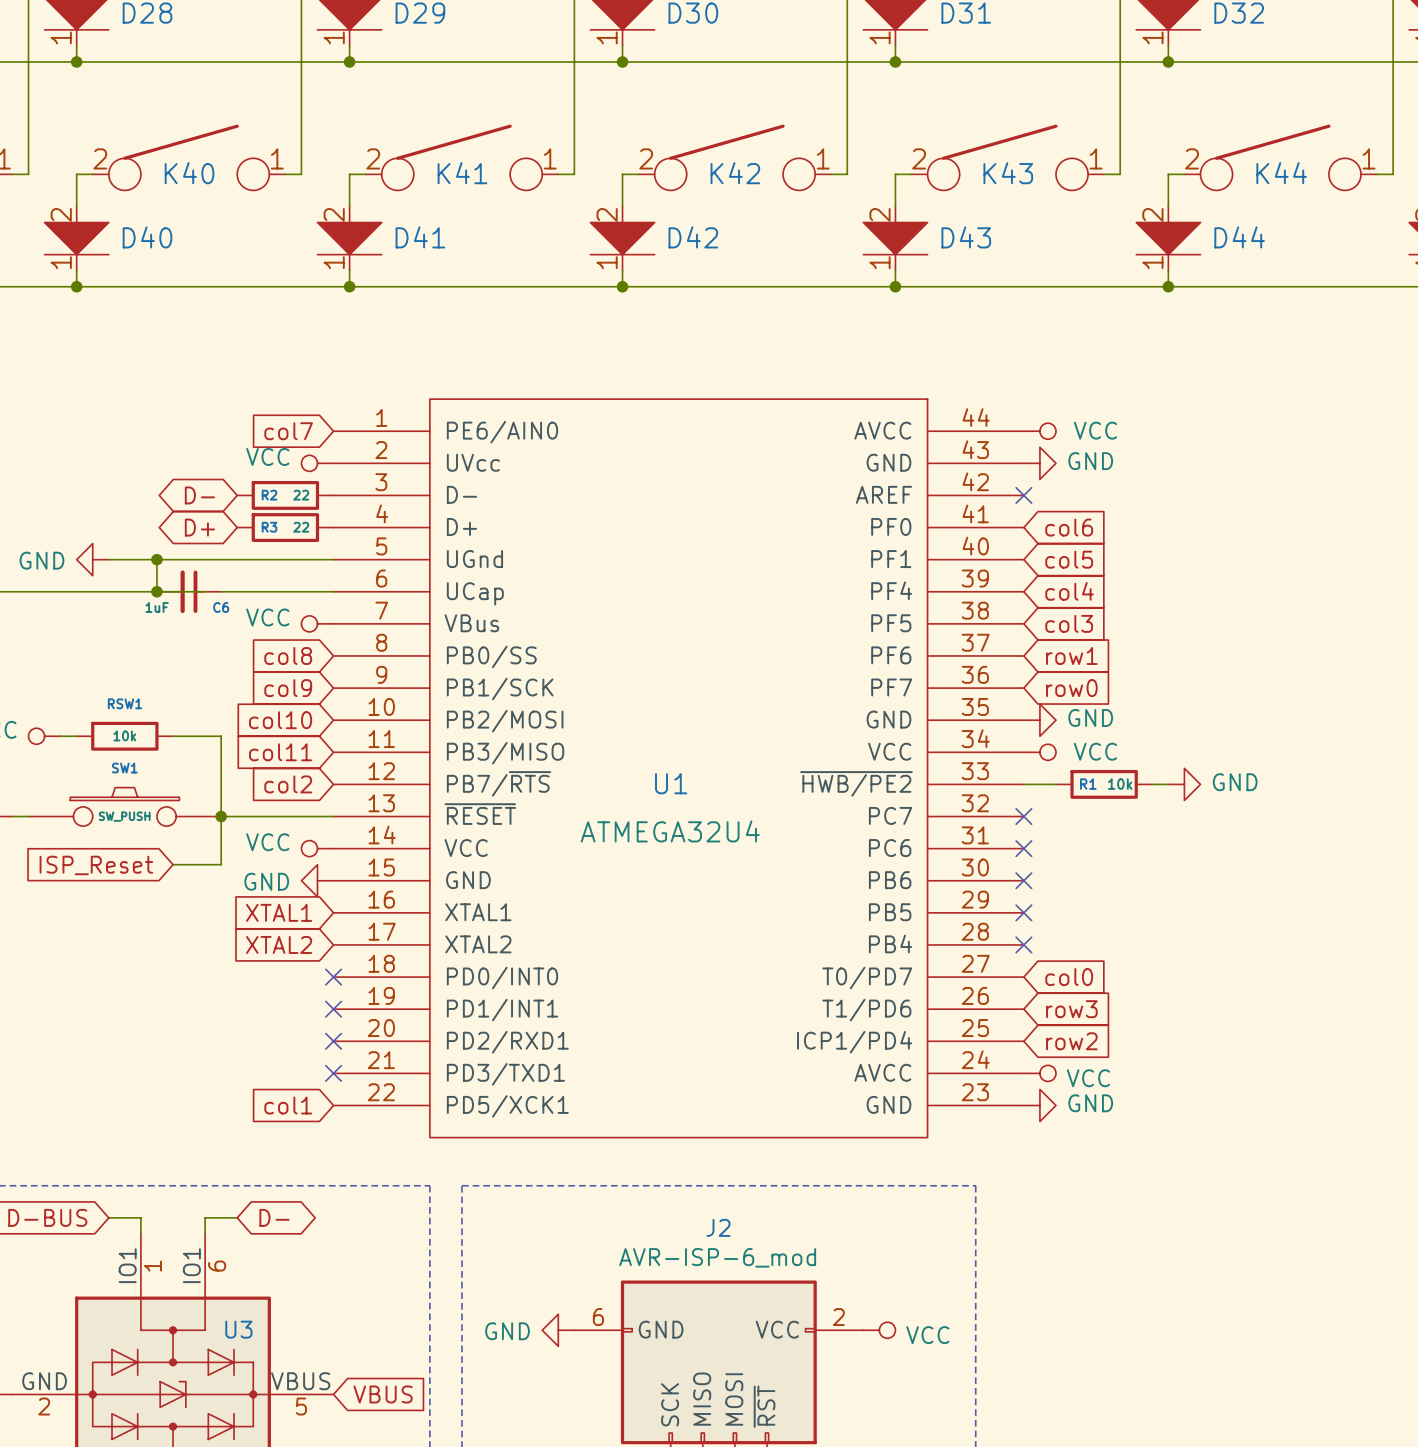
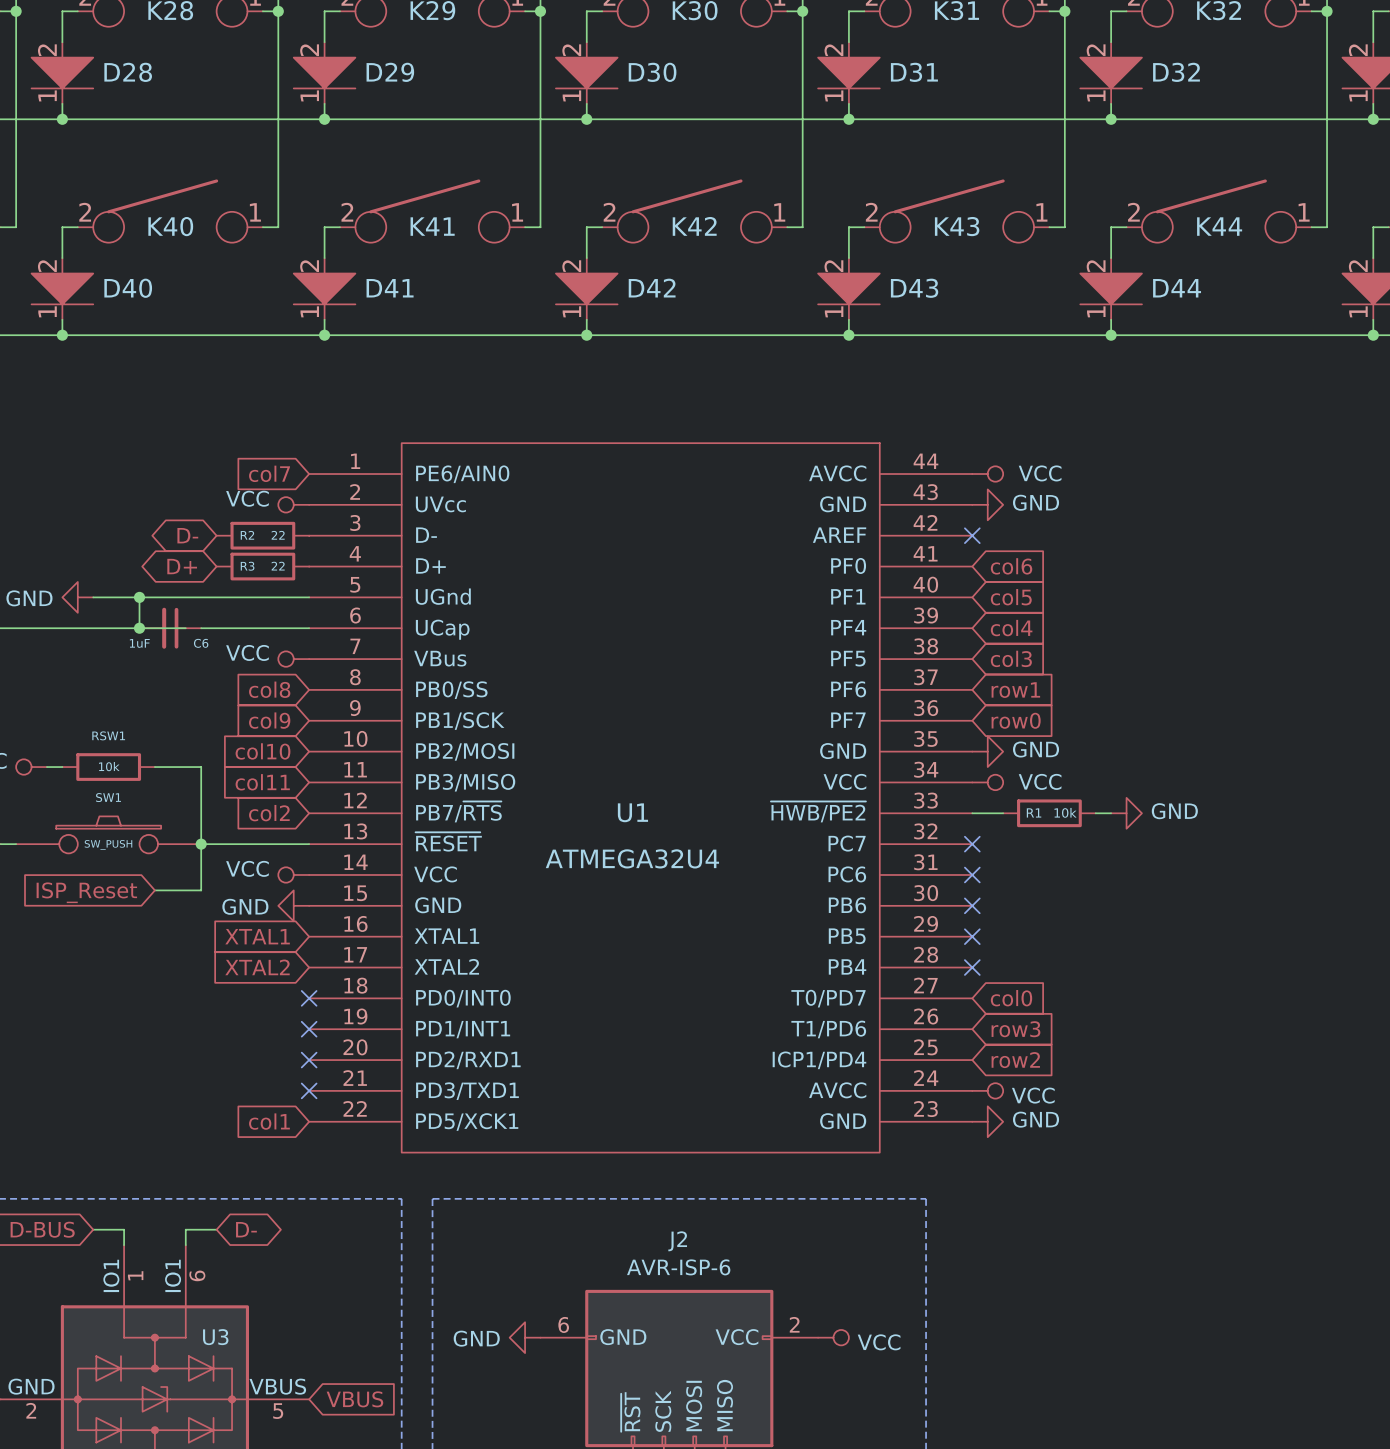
J2 value: AVR-ISP-6_mod (717, 1257) -> AVR-ISP-6 (678, 1267)
J2 pin name: MISO (702, 1399) -> SCK (663, 1411)
J2 pin name: SCK (670, 1404) -> ~{RST} (630, 1411)
J2 pin name: ~{RST} (764, 1406) -> MISO (724, 1405)

